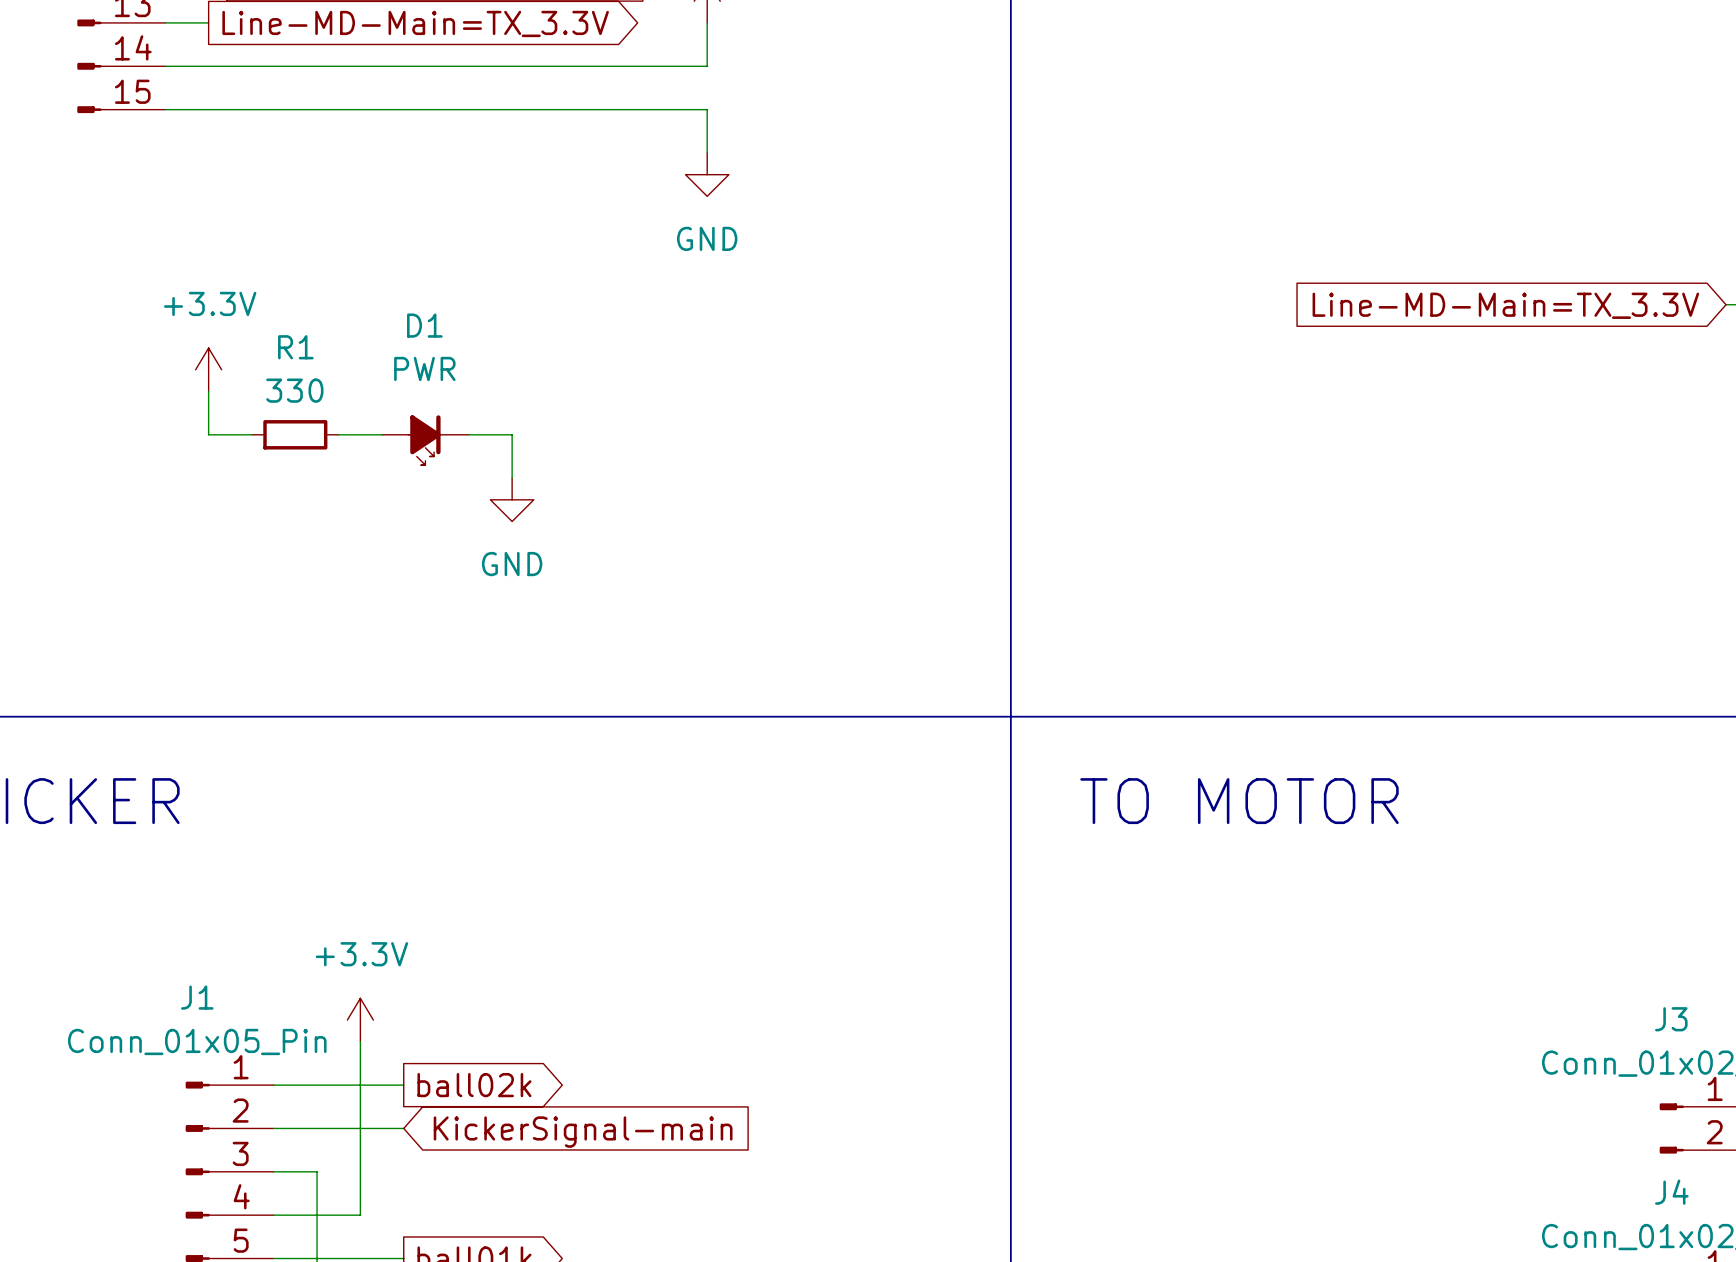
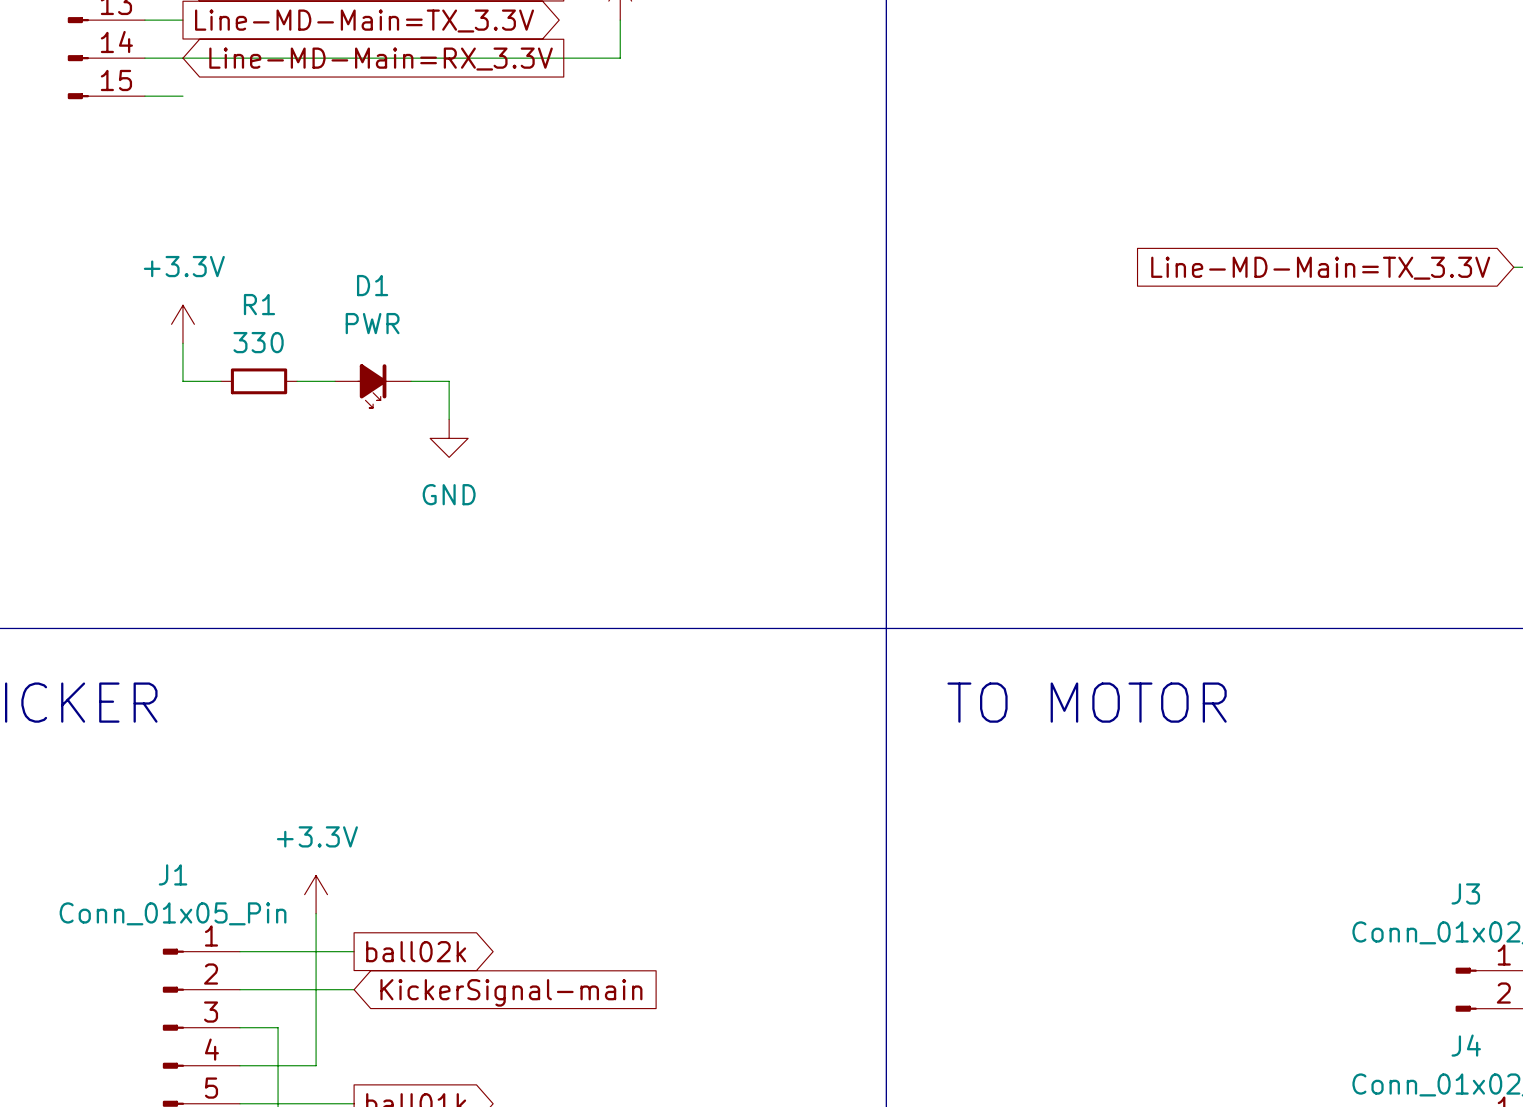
global label: none -> Line-MD-Main=RX_3.3V (381, 59)
wire: (208, 109) (707, 109) (707, 153) -> none
power symbol: GND (707, 174) -> none

